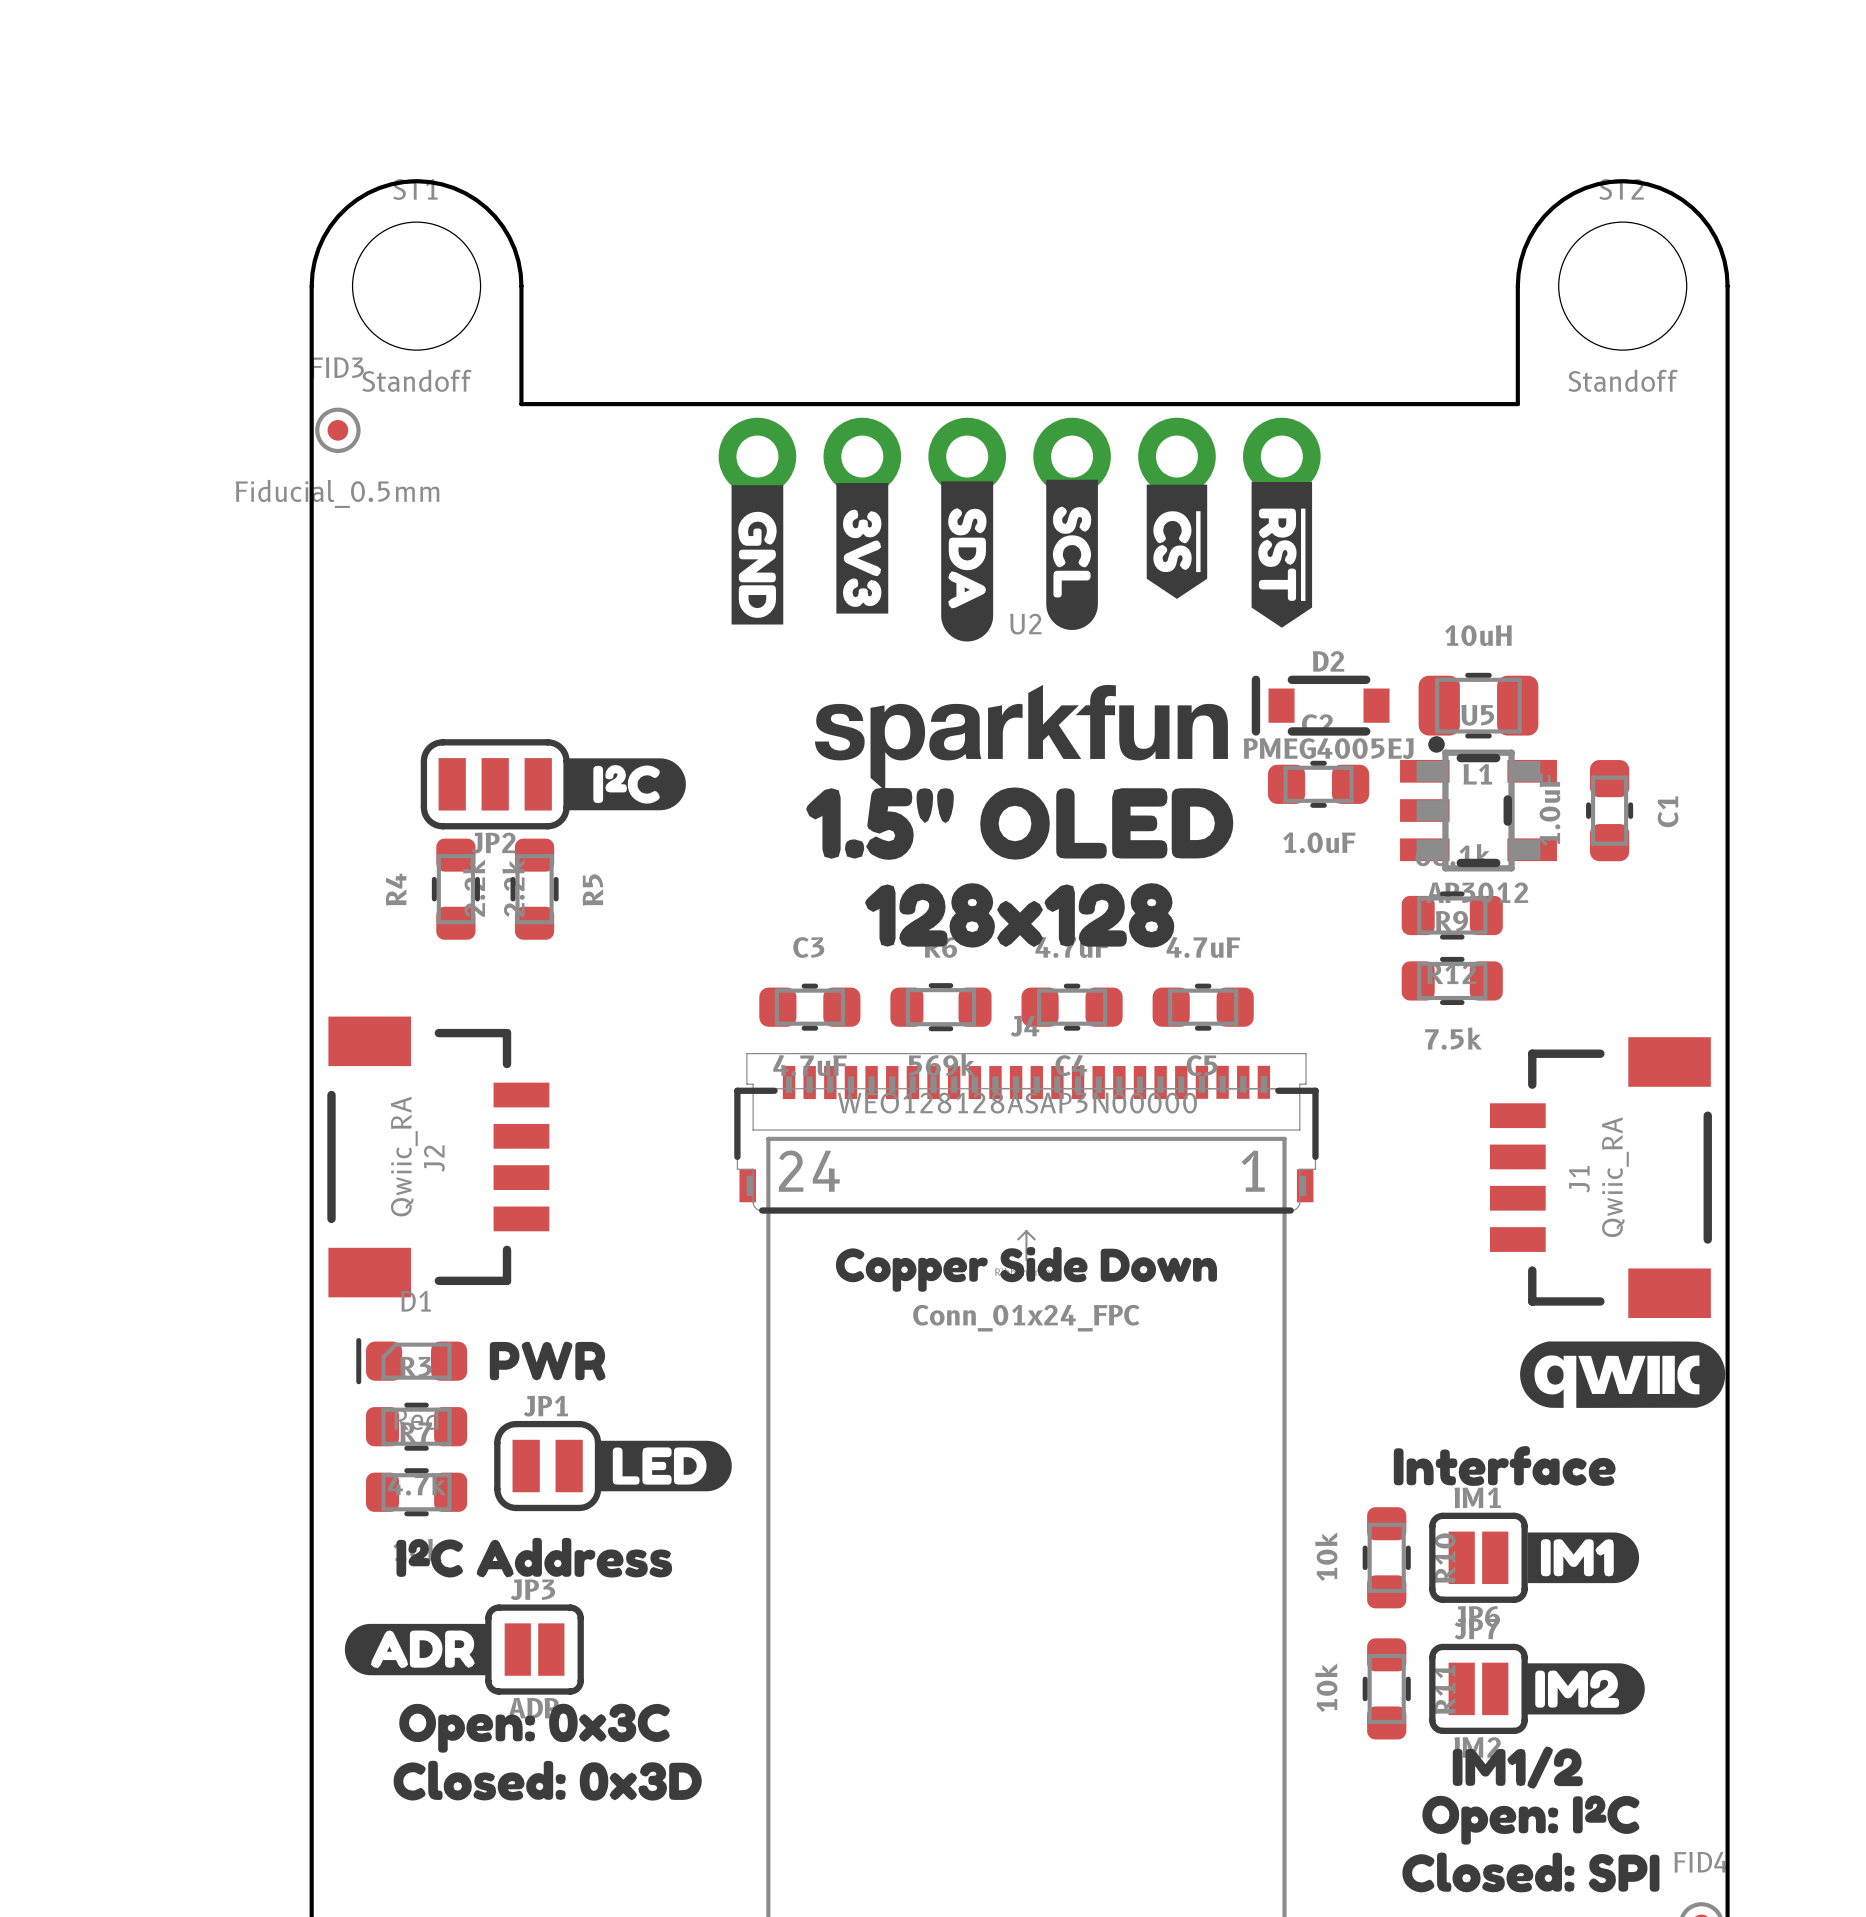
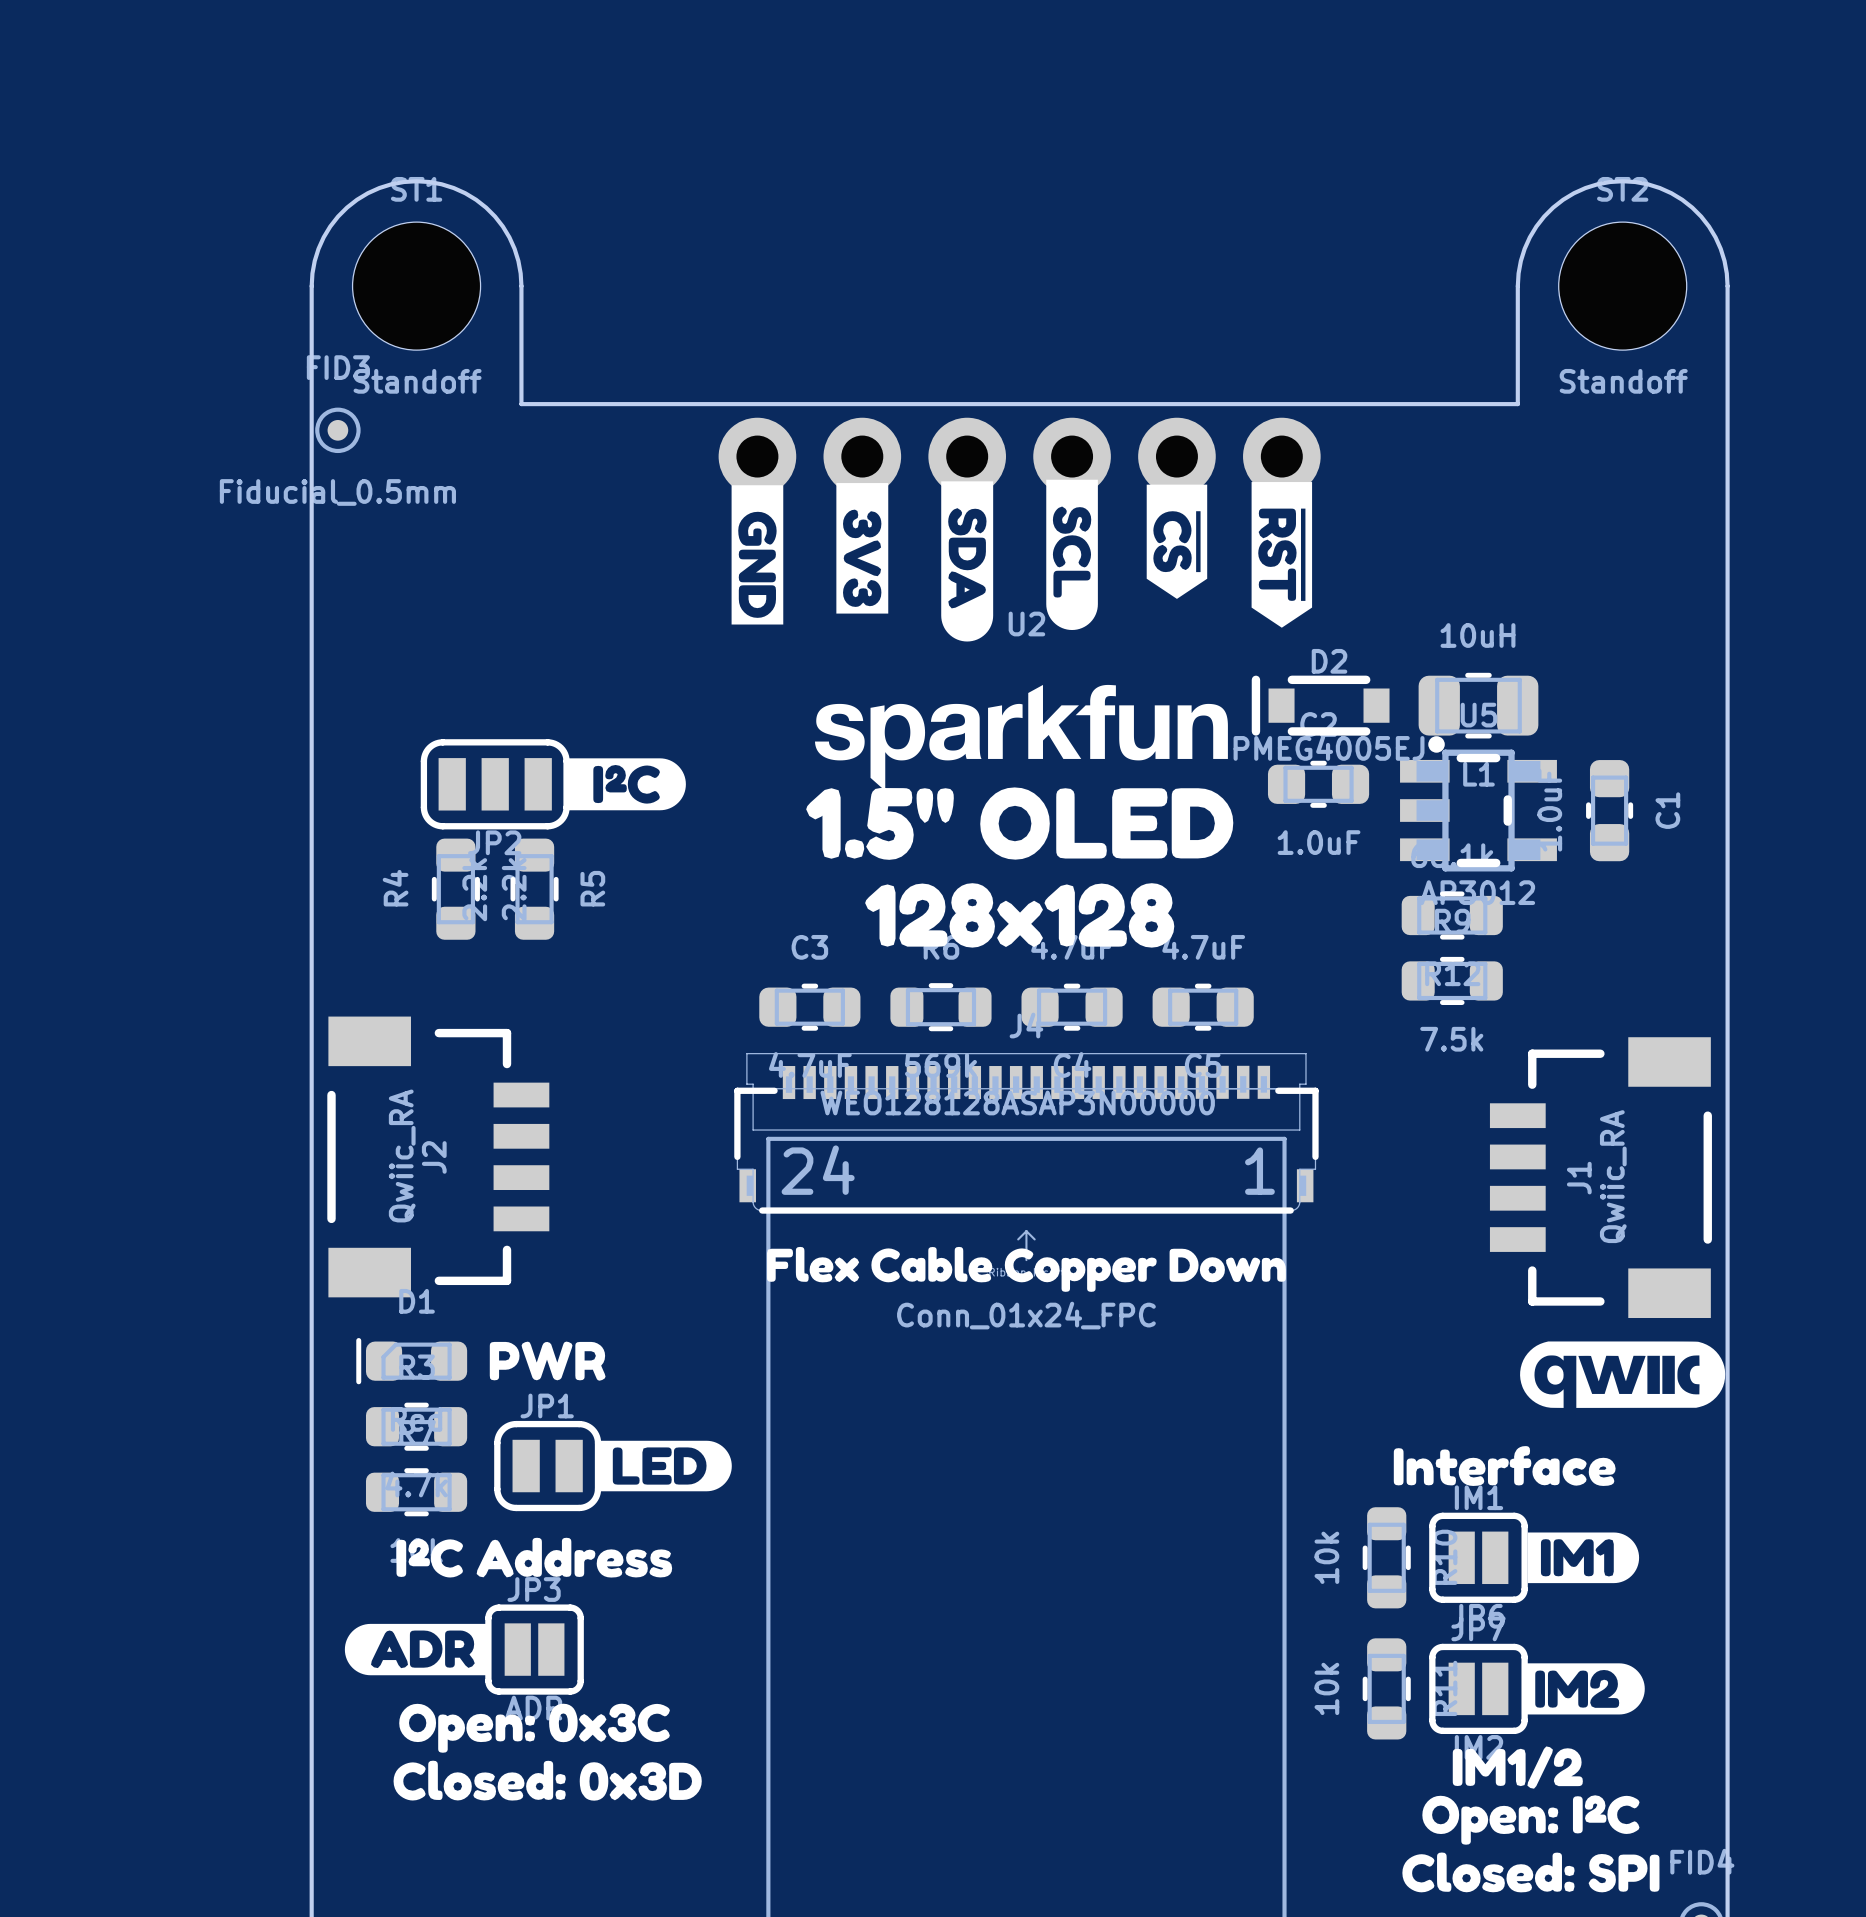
drawing shape: [835, 1246, 1217, 1292] -> [767, 1246, 1286, 1292]

